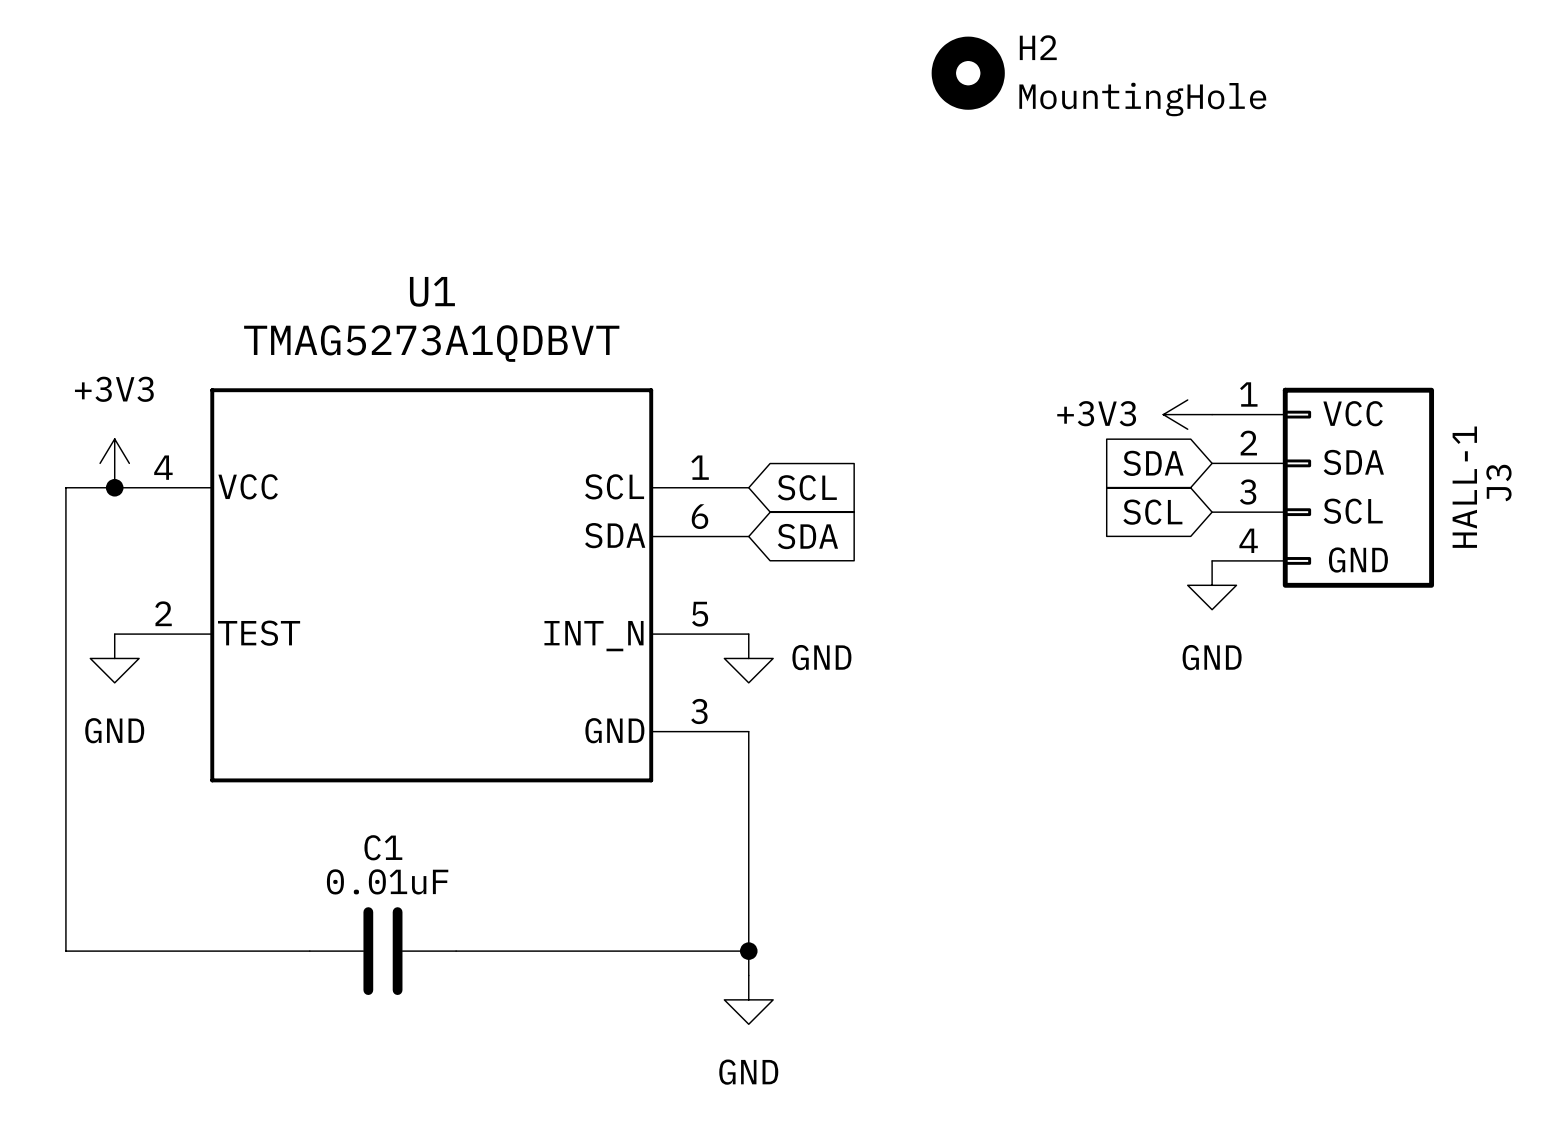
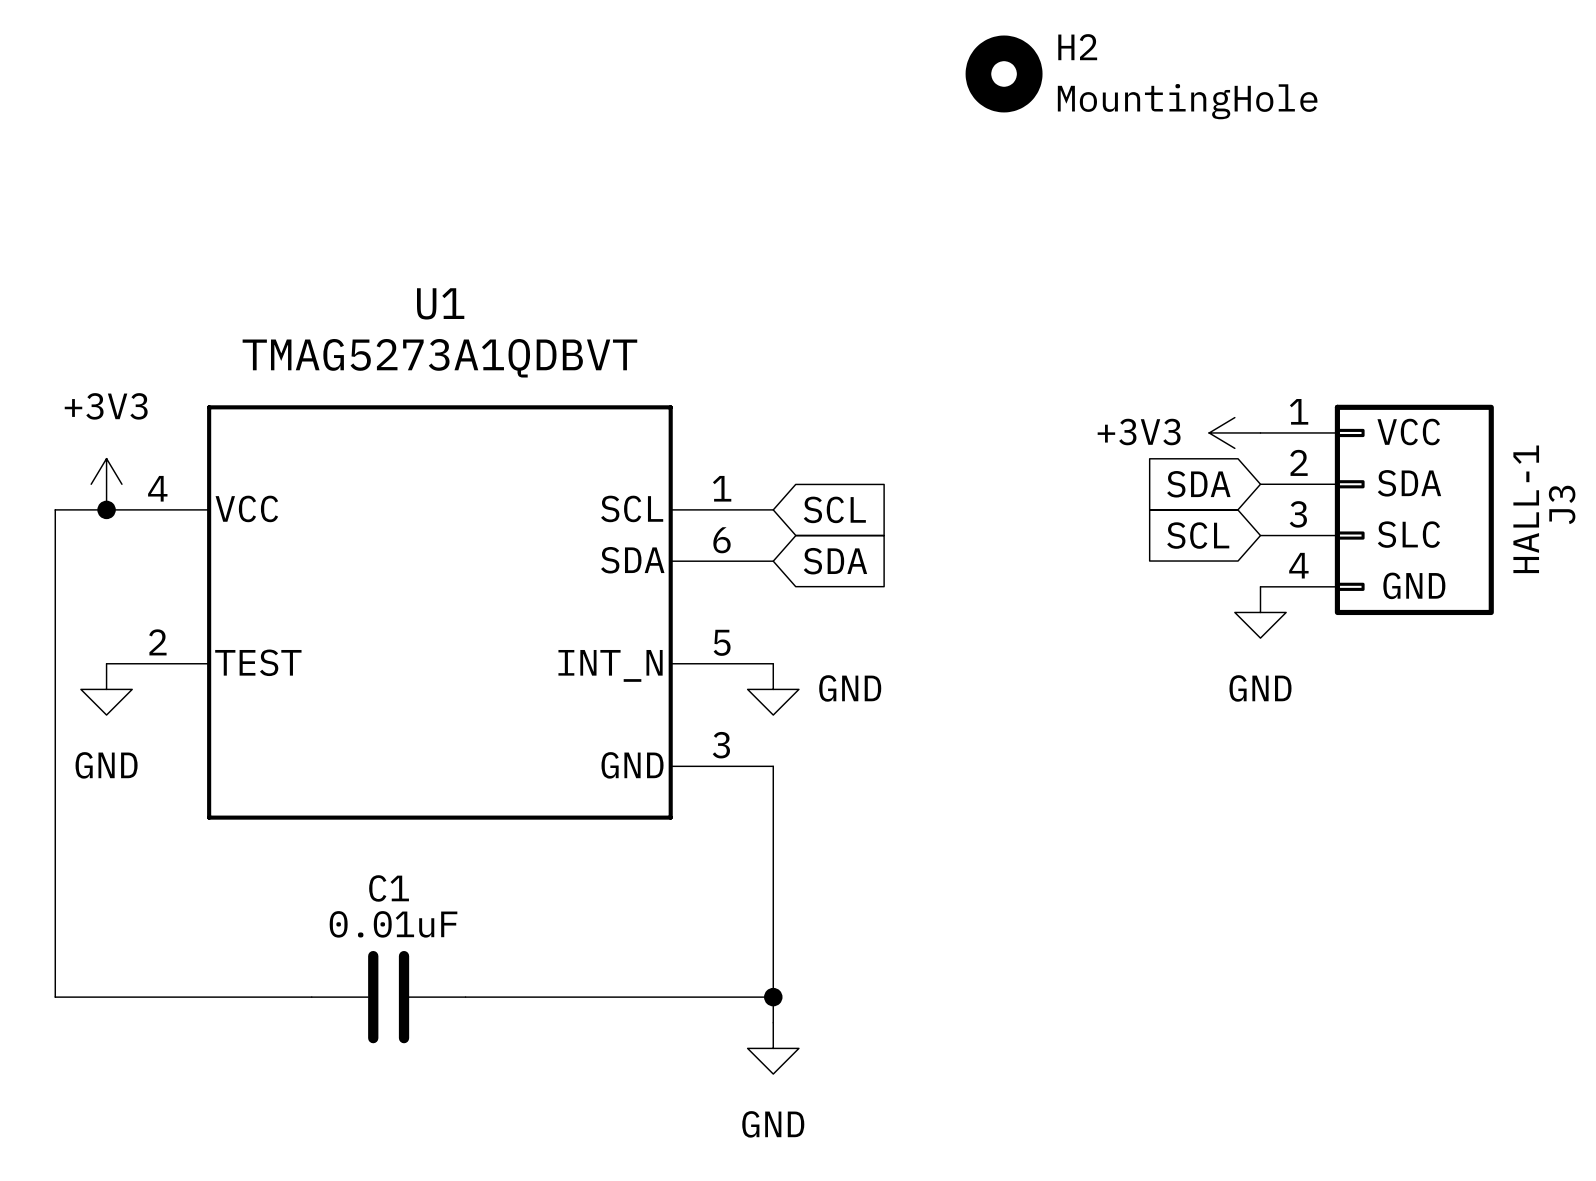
J3 text: SCL (1353, 511) -> SLC (1408, 534)

